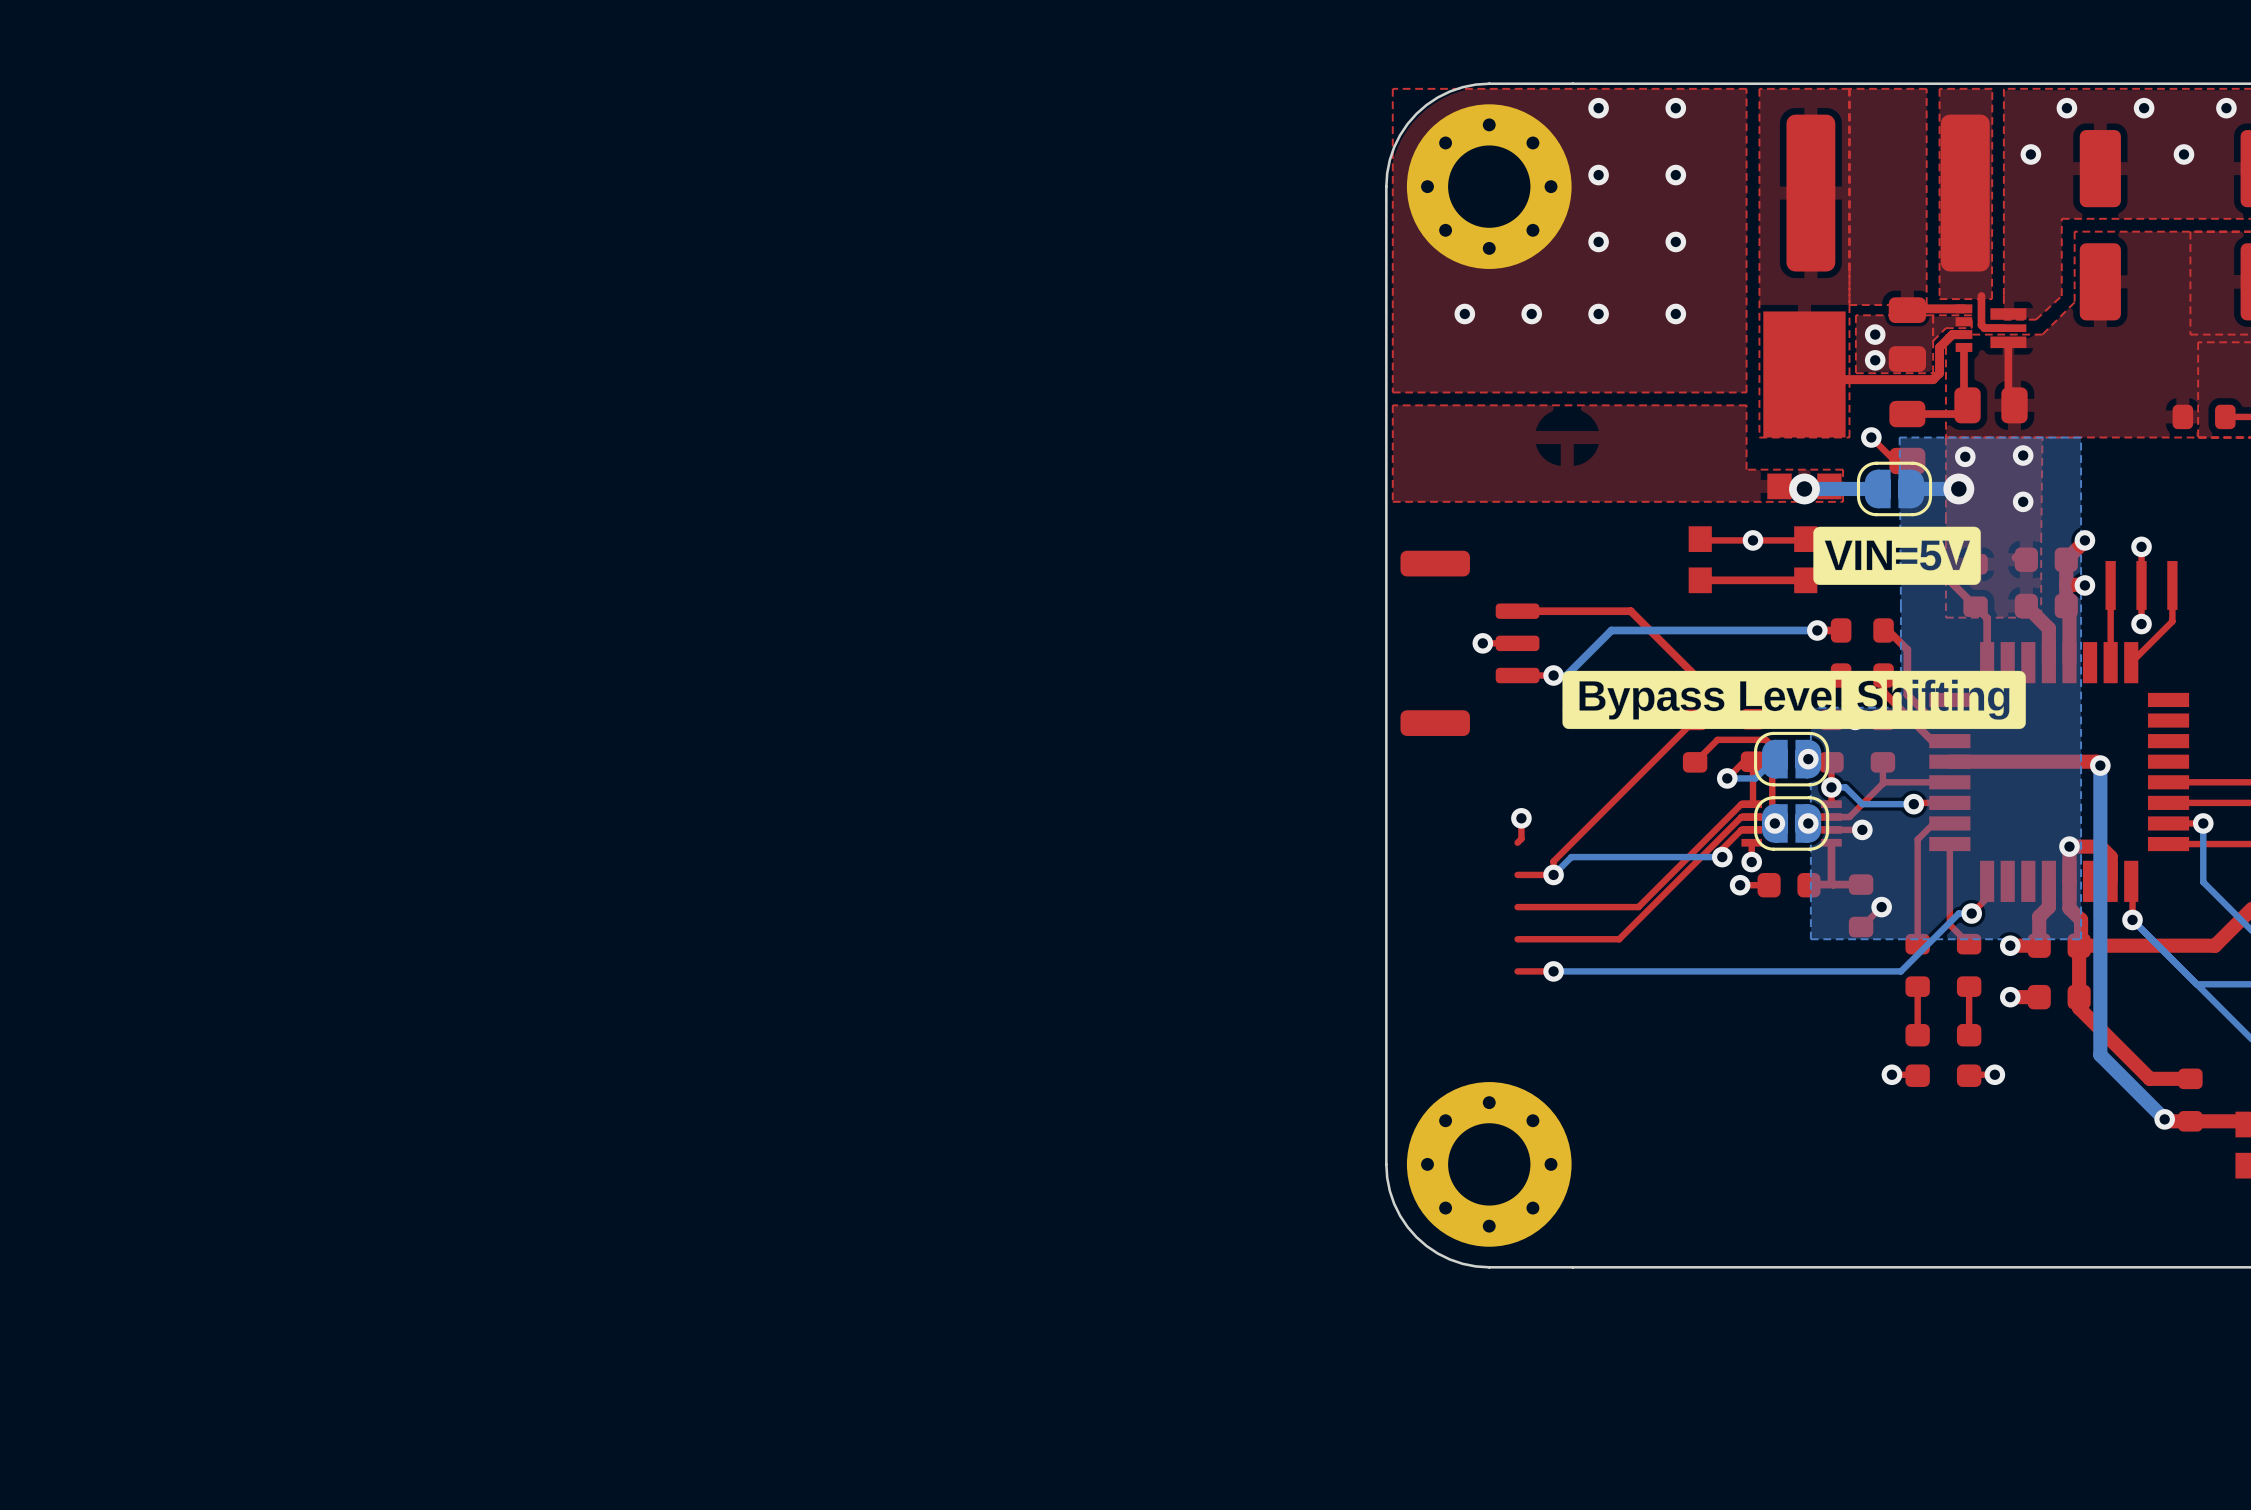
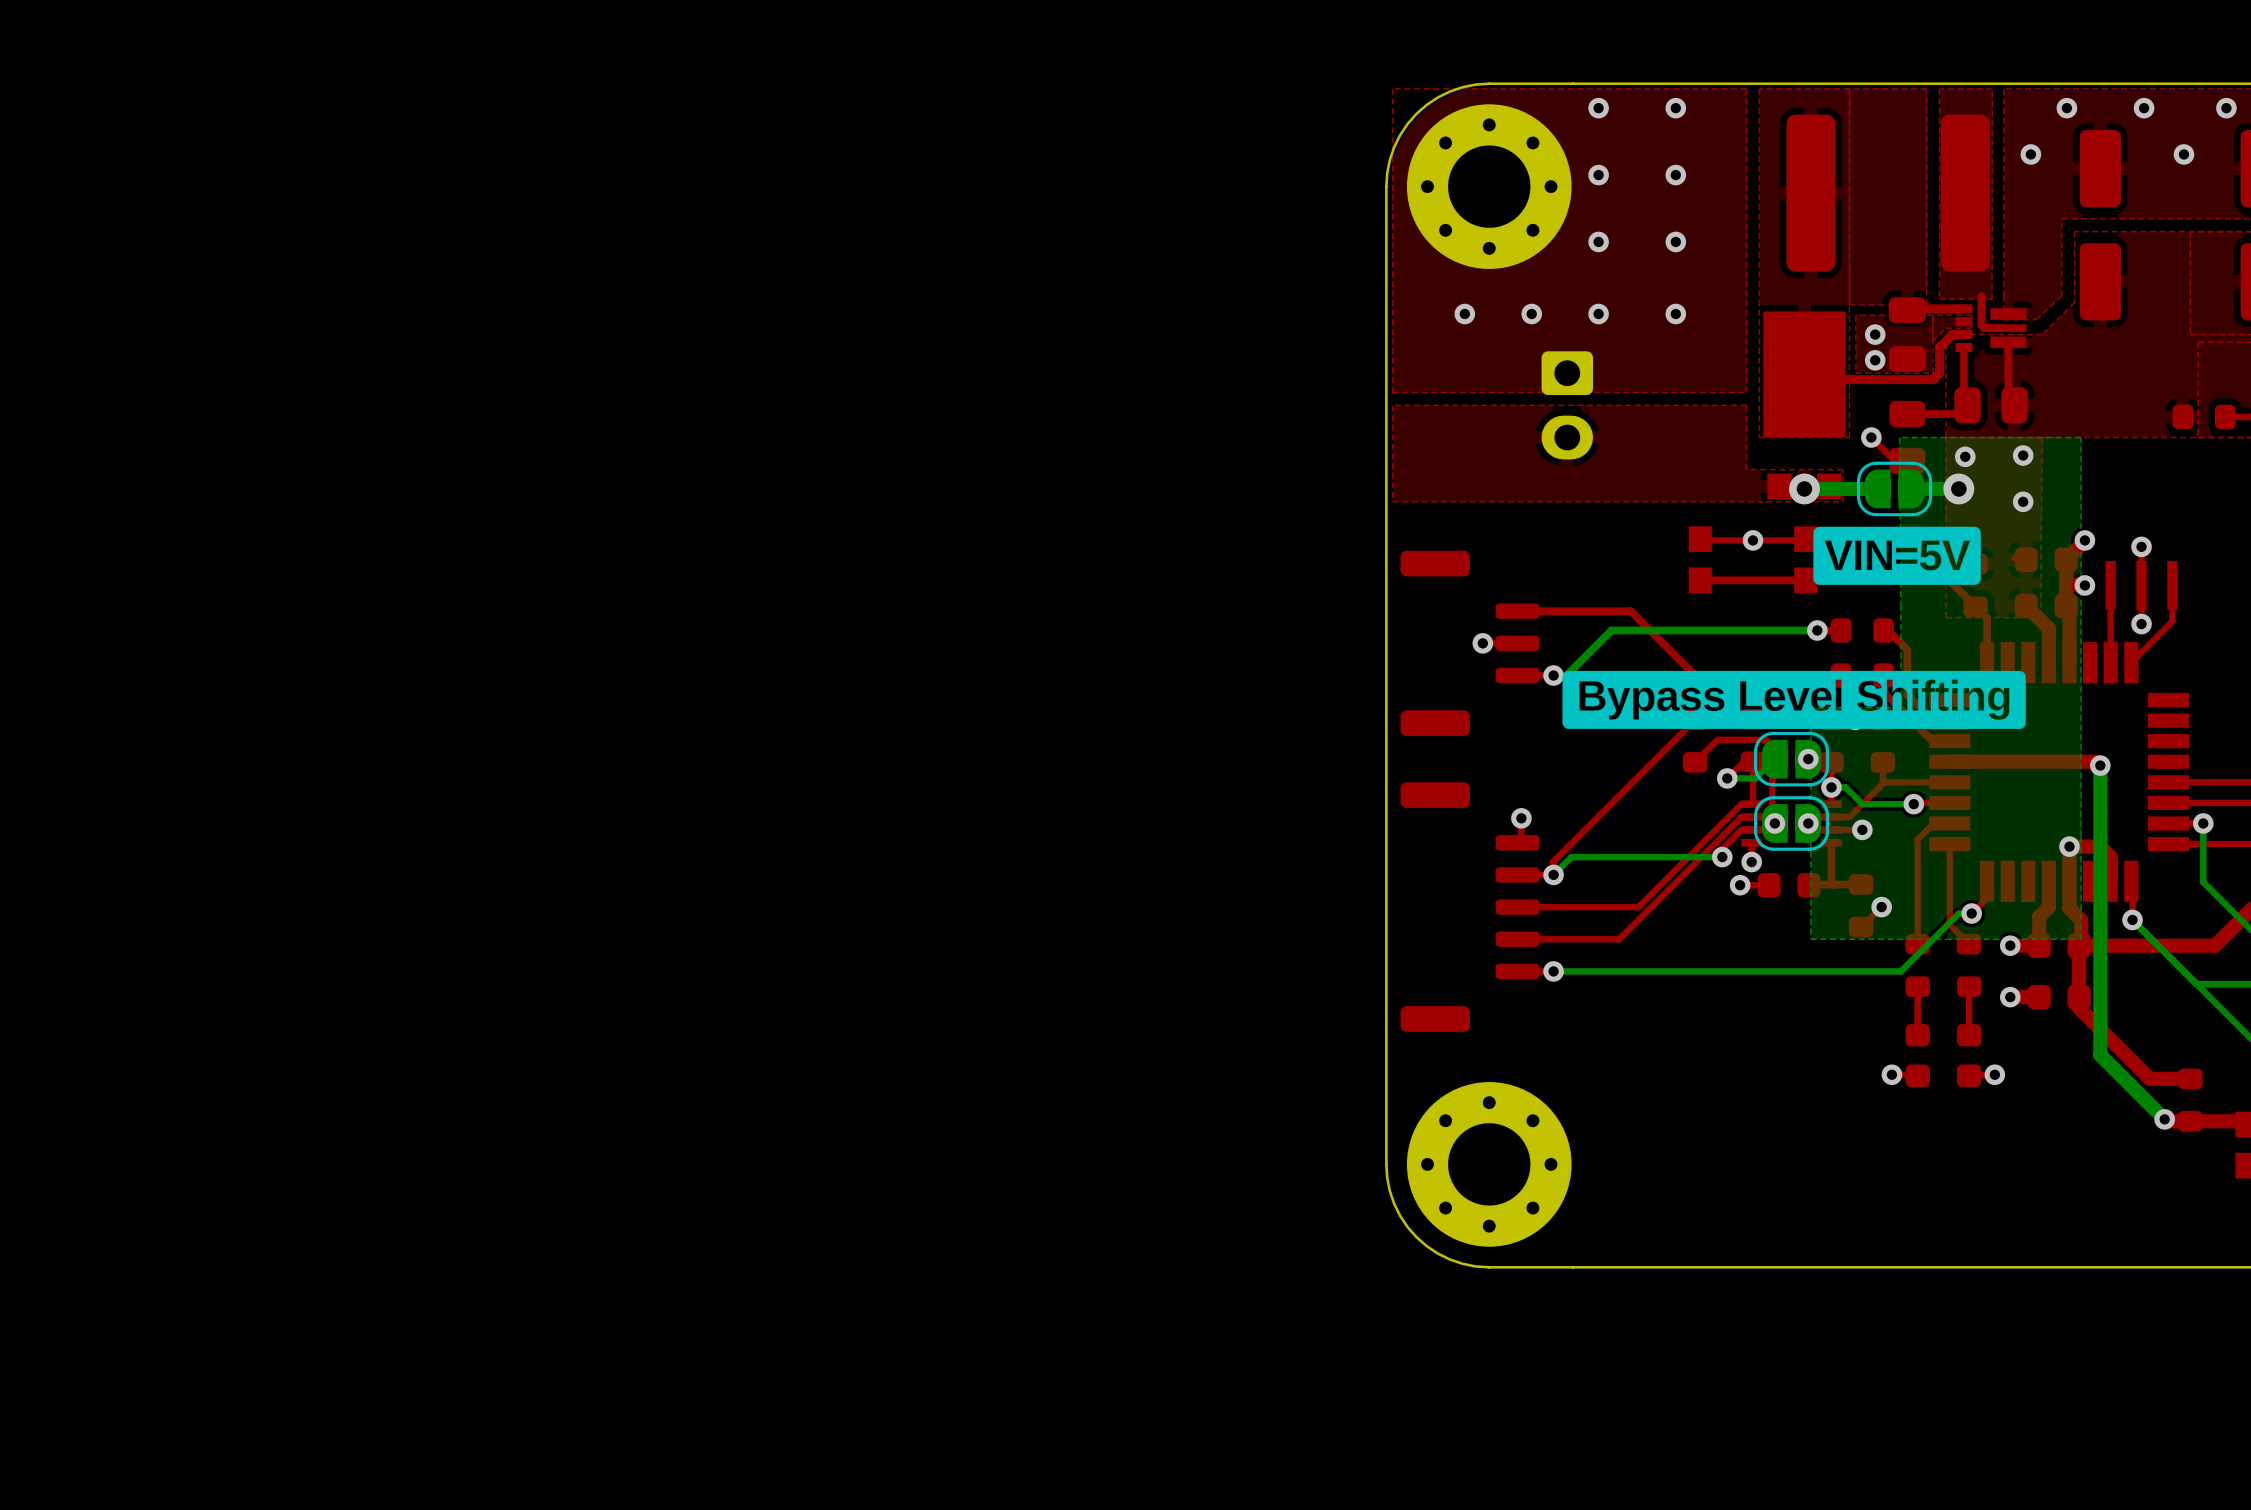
part: none -> (1567, 405)
part: none -> (1469, 907)

